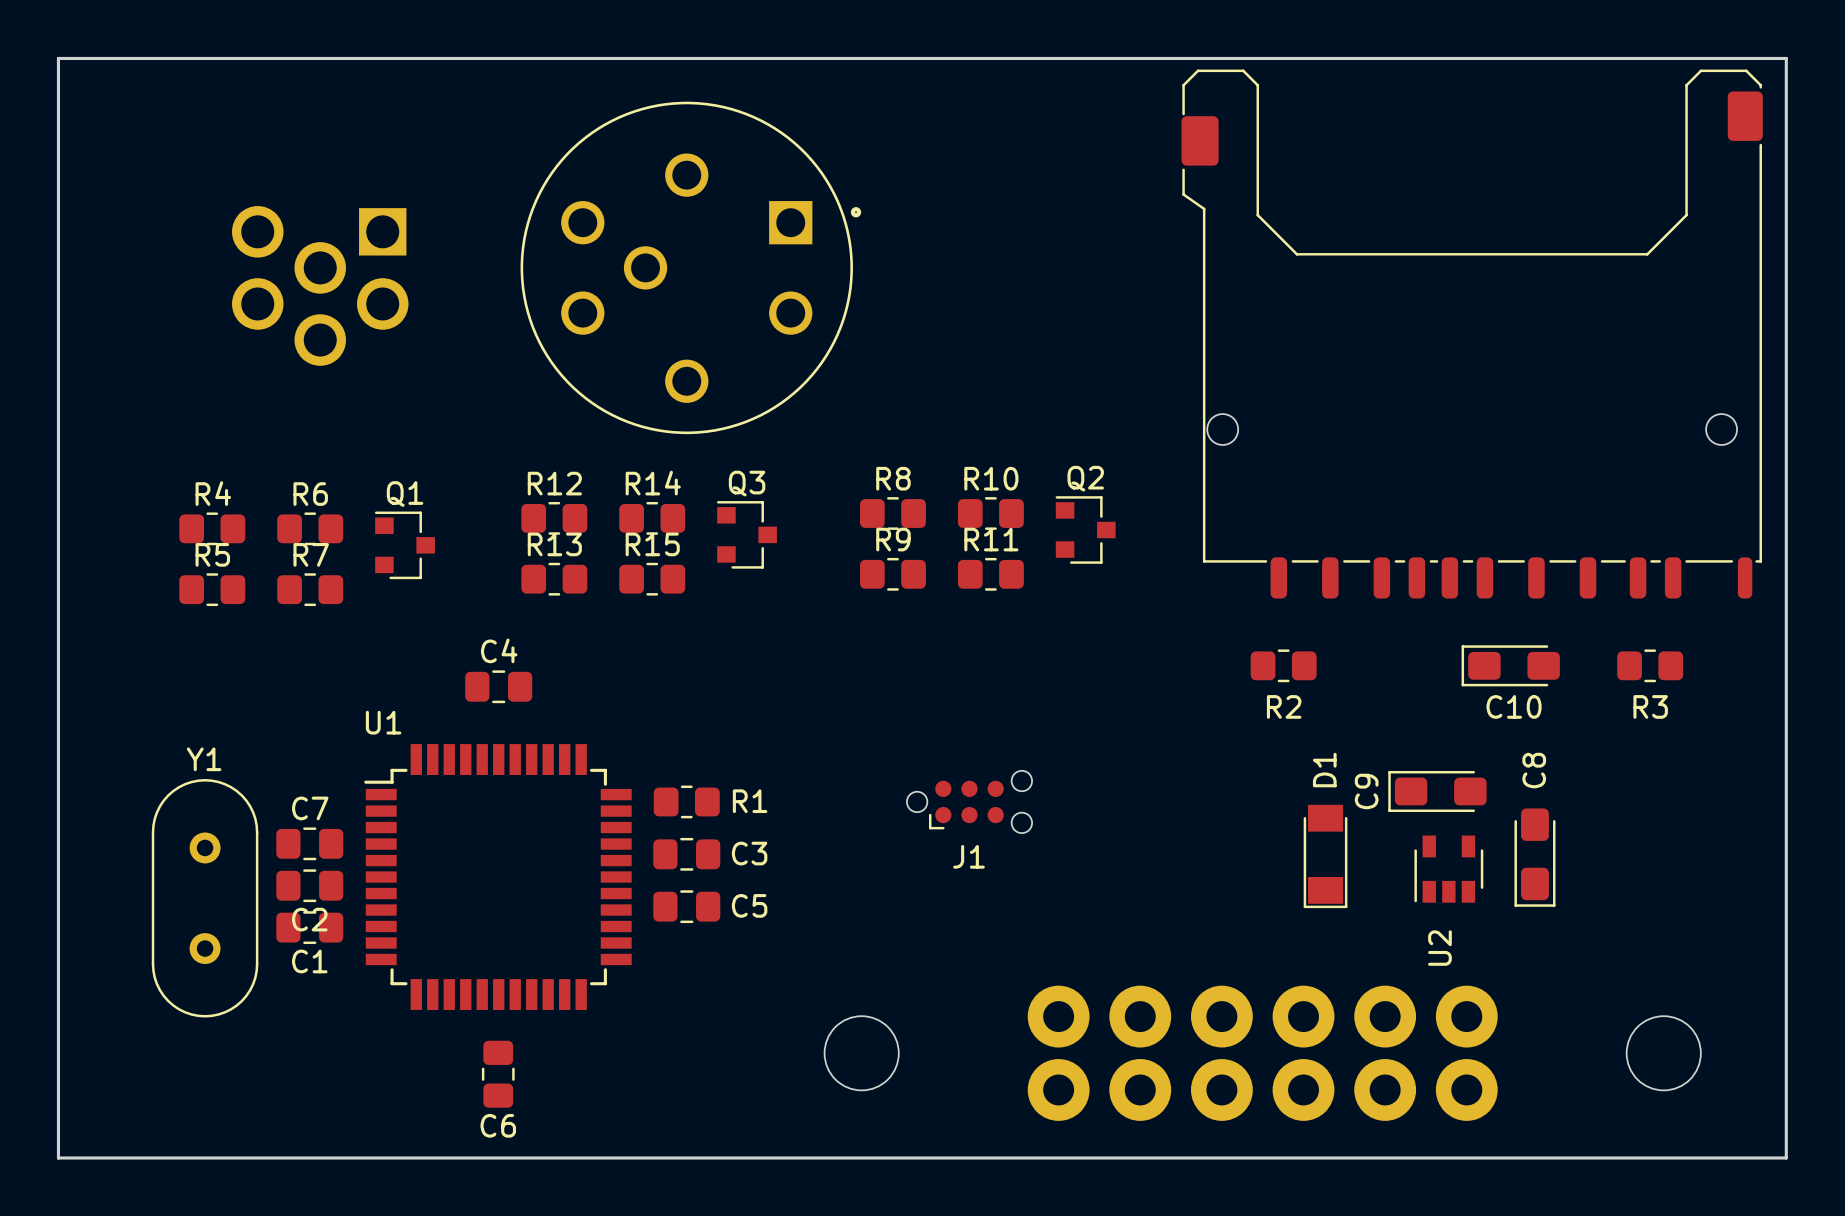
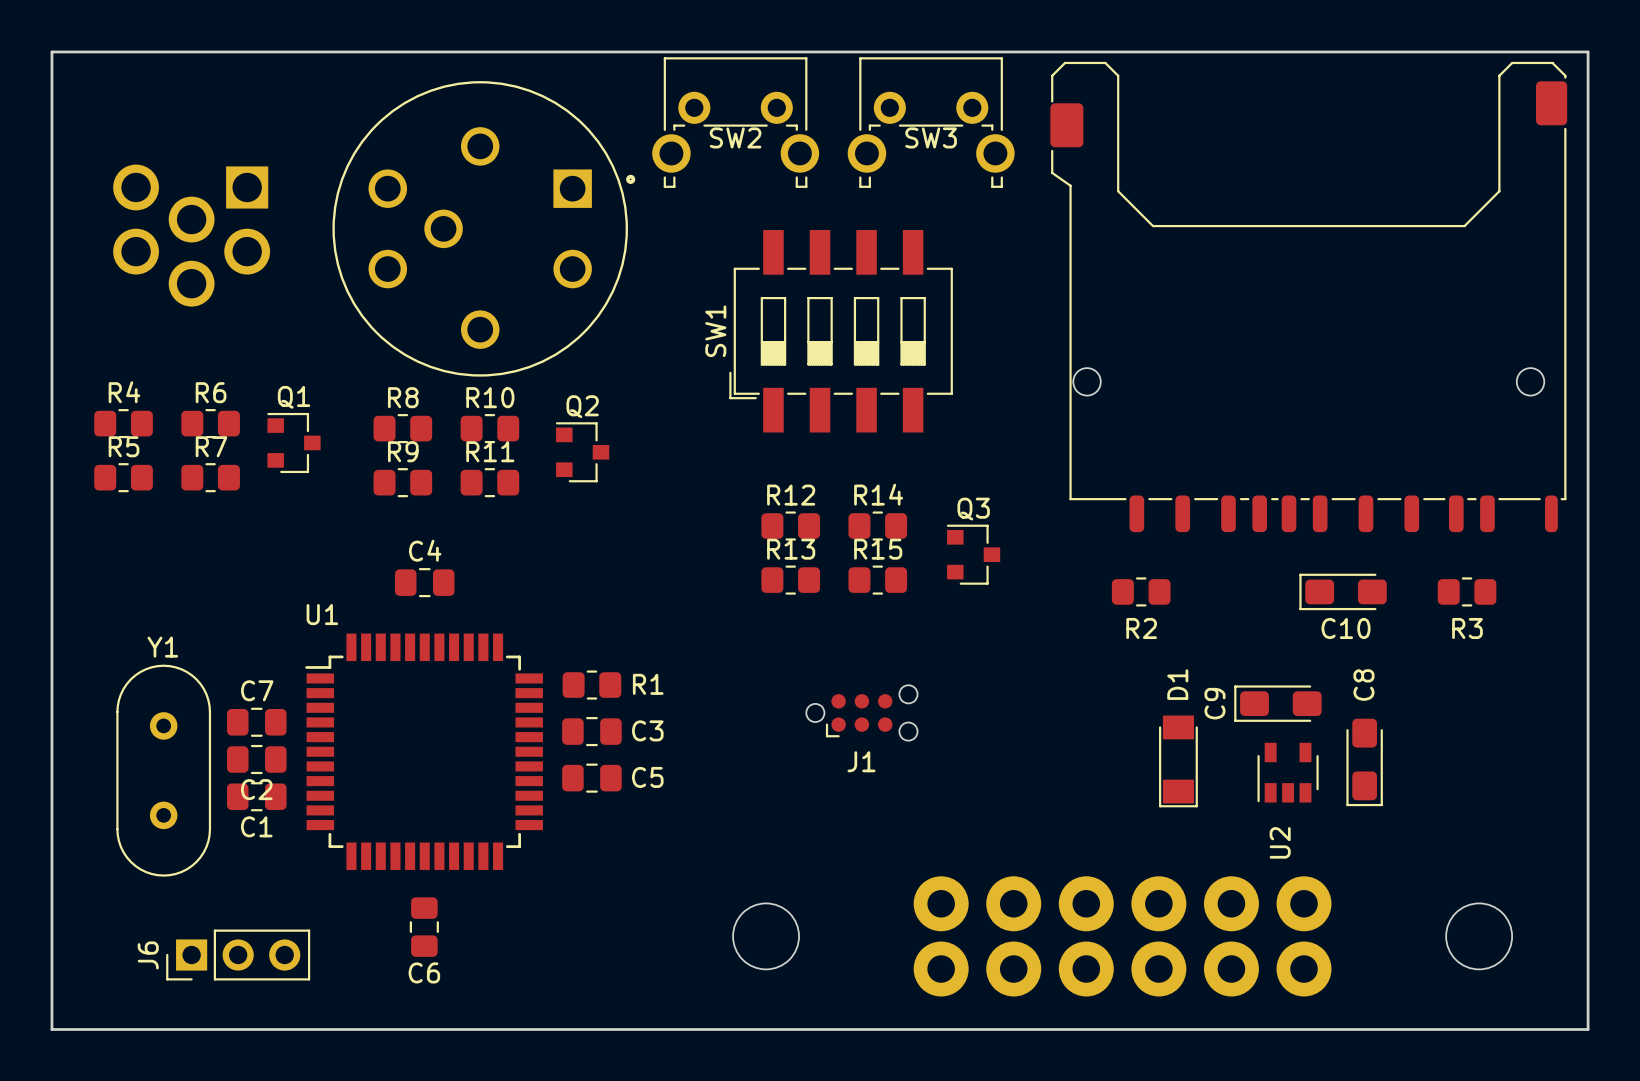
SW2: none -> (735, 122)
SW3: none -> (931, 122)
part position: (690, 267) -> (483, 228)
part position: (320, 285) -> (191, 235)
SW1: none -> (841, 331)
R8 position: (892, 513) -> (402, 428)
R10 position: (990, 513) -> (489, 428)
R12 position: (554, 518) -> (790, 526)
R14 position: (652, 518) -> (877, 526)
R4 position: (212, 528) -> (123, 423)
R6 position: (310, 528) -> (210, 423)
Q2 position: (1085, 530) -> (582, 452)
Q3 position: (746, 534) -> (973, 554)
Q1 position: (404, 545) -> (293, 442)
R9 position: (892, 574) -> (402, 482)
R11 position: (990, 574) -> (489, 482)
R13 position: (554, 579) -> (790, 580)
R15 position: (652, 579) -> (877, 580)
R5 position: (212, 589) -> (123, 477)
R7 position: (310, 589) -> (210, 477)
C4 position: (498, 686) -> (424, 582)
R1 position: (686, 801) -> (591, 685)
C7 position: (309, 843) -> (256, 722)
C3 position: (686, 854) -> (591, 731)
U1 position: (497, 877) -> (424, 751)
C2 position: (309, 885) -> (256, 759)
Y1 position: (205, 898) -> (163, 770)
C5 position: (686, 906) -> (591, 778)
C1 position: (309, 927) -> (256, 796)
J6: none -> (238, 955)
C6 position: (498, 1074) -> (424, 927)

